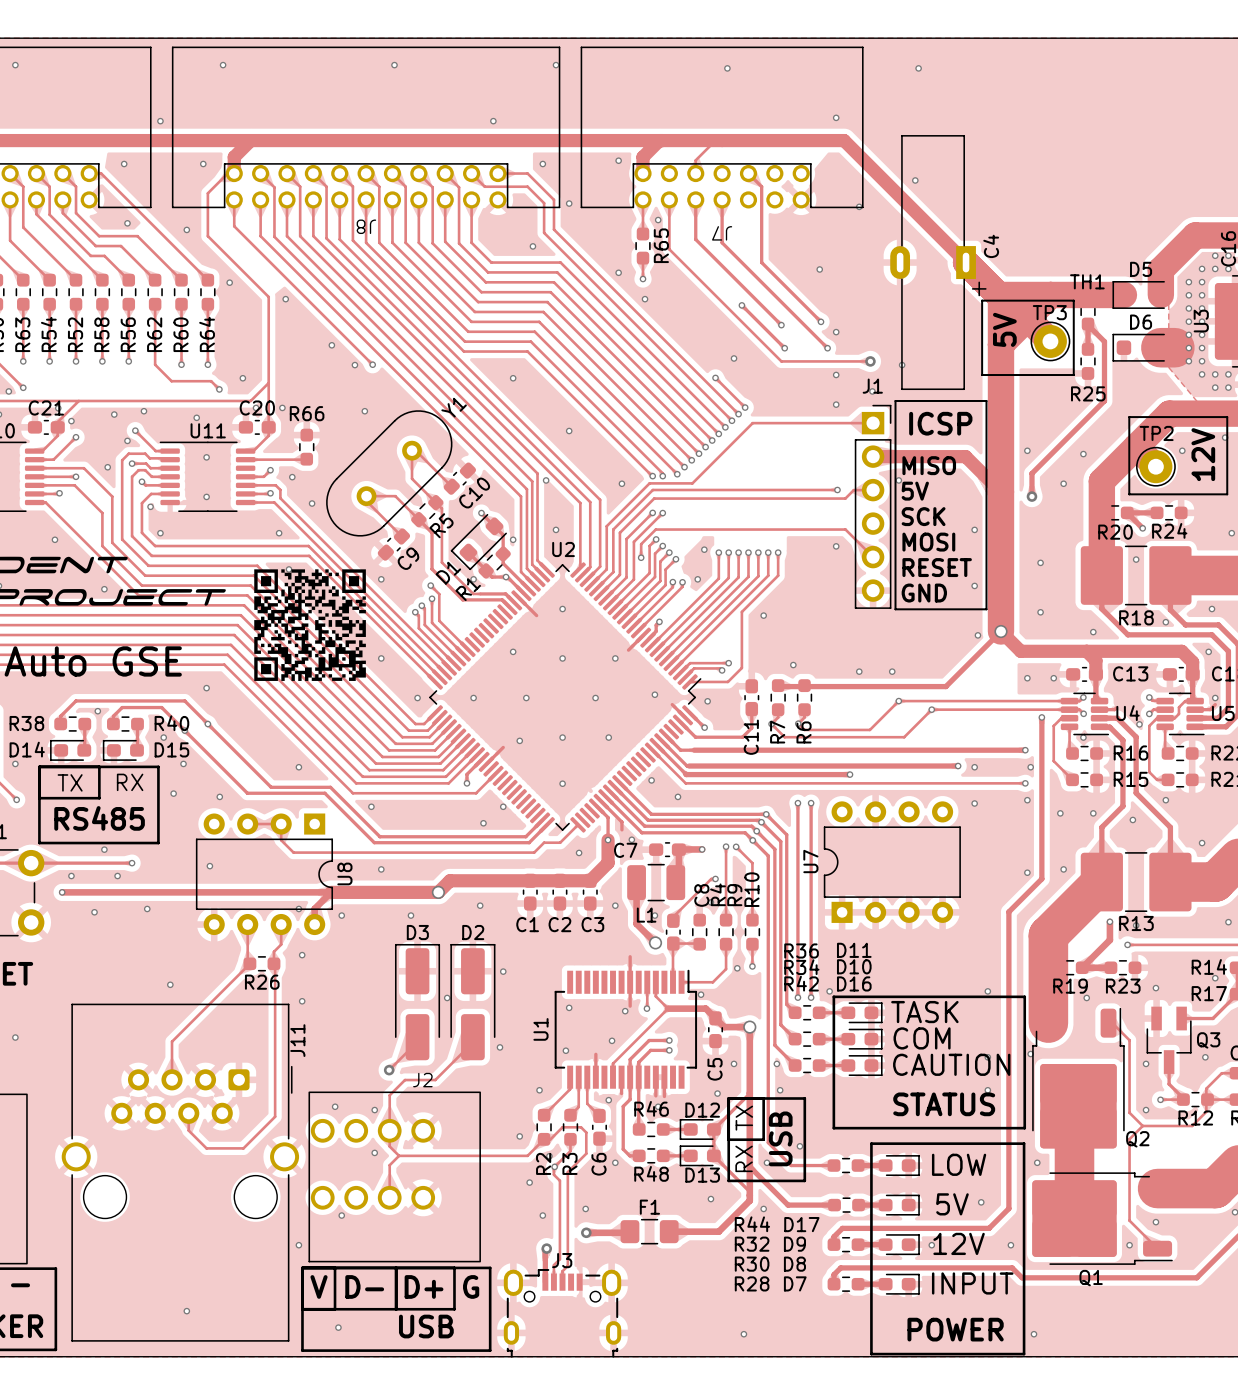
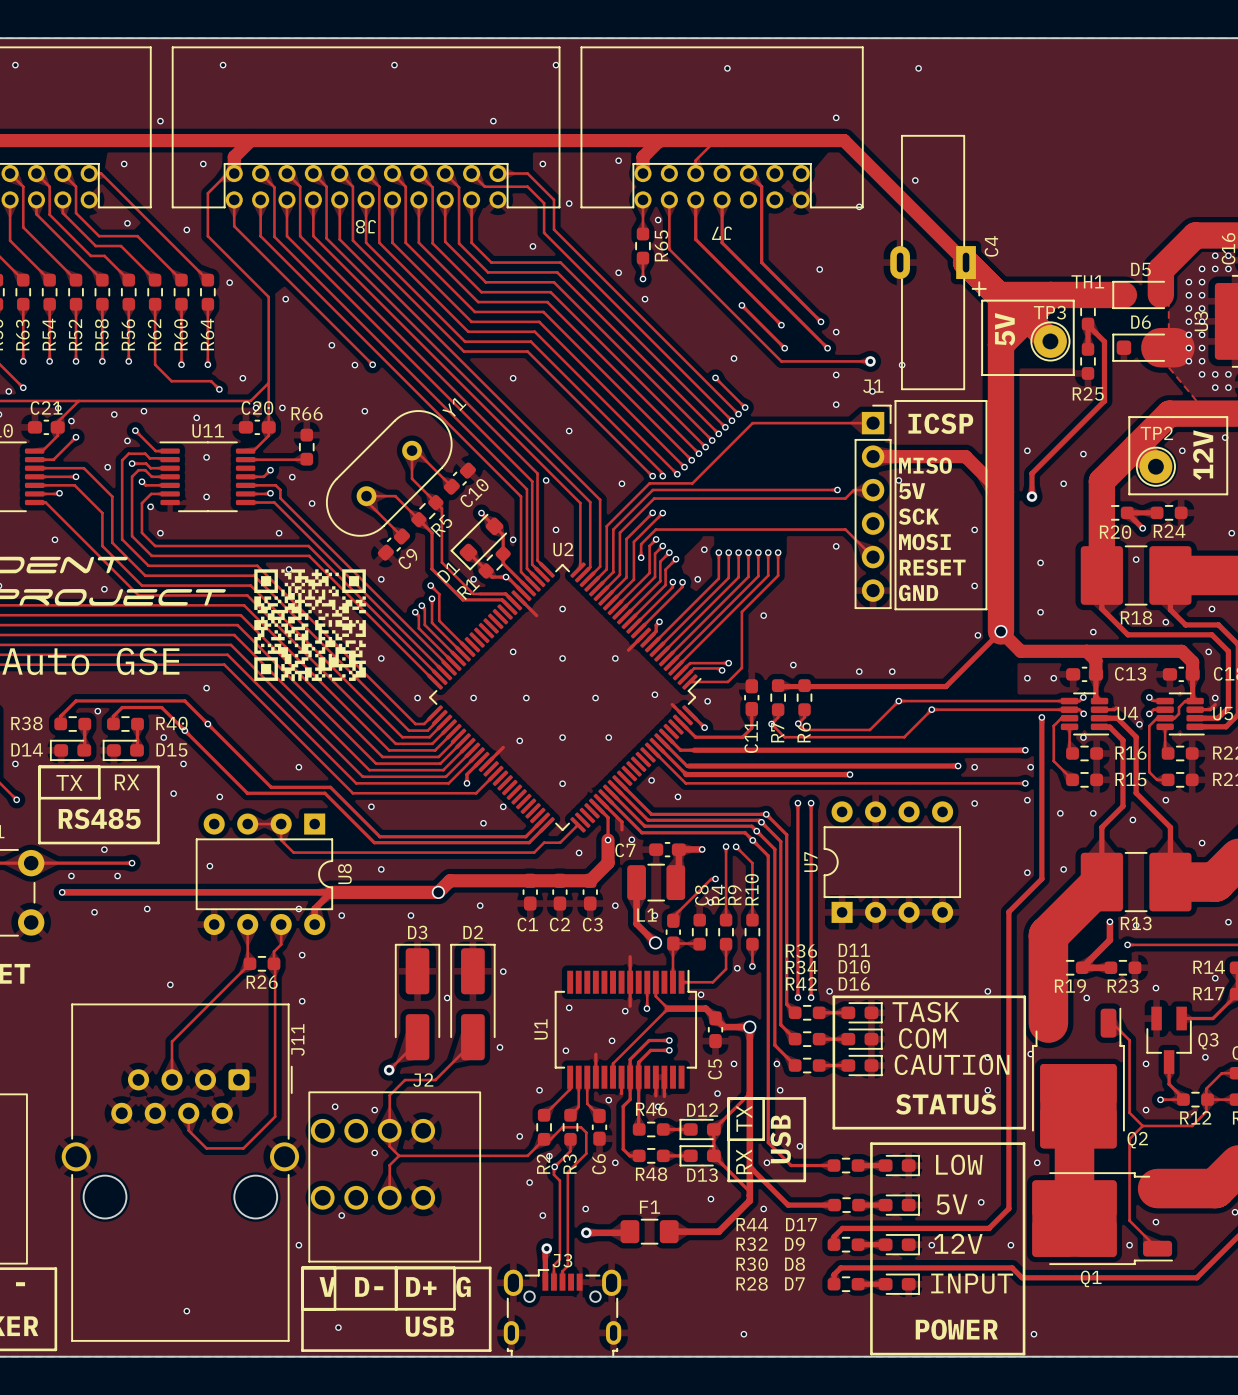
via: (15, 1037) -> none

